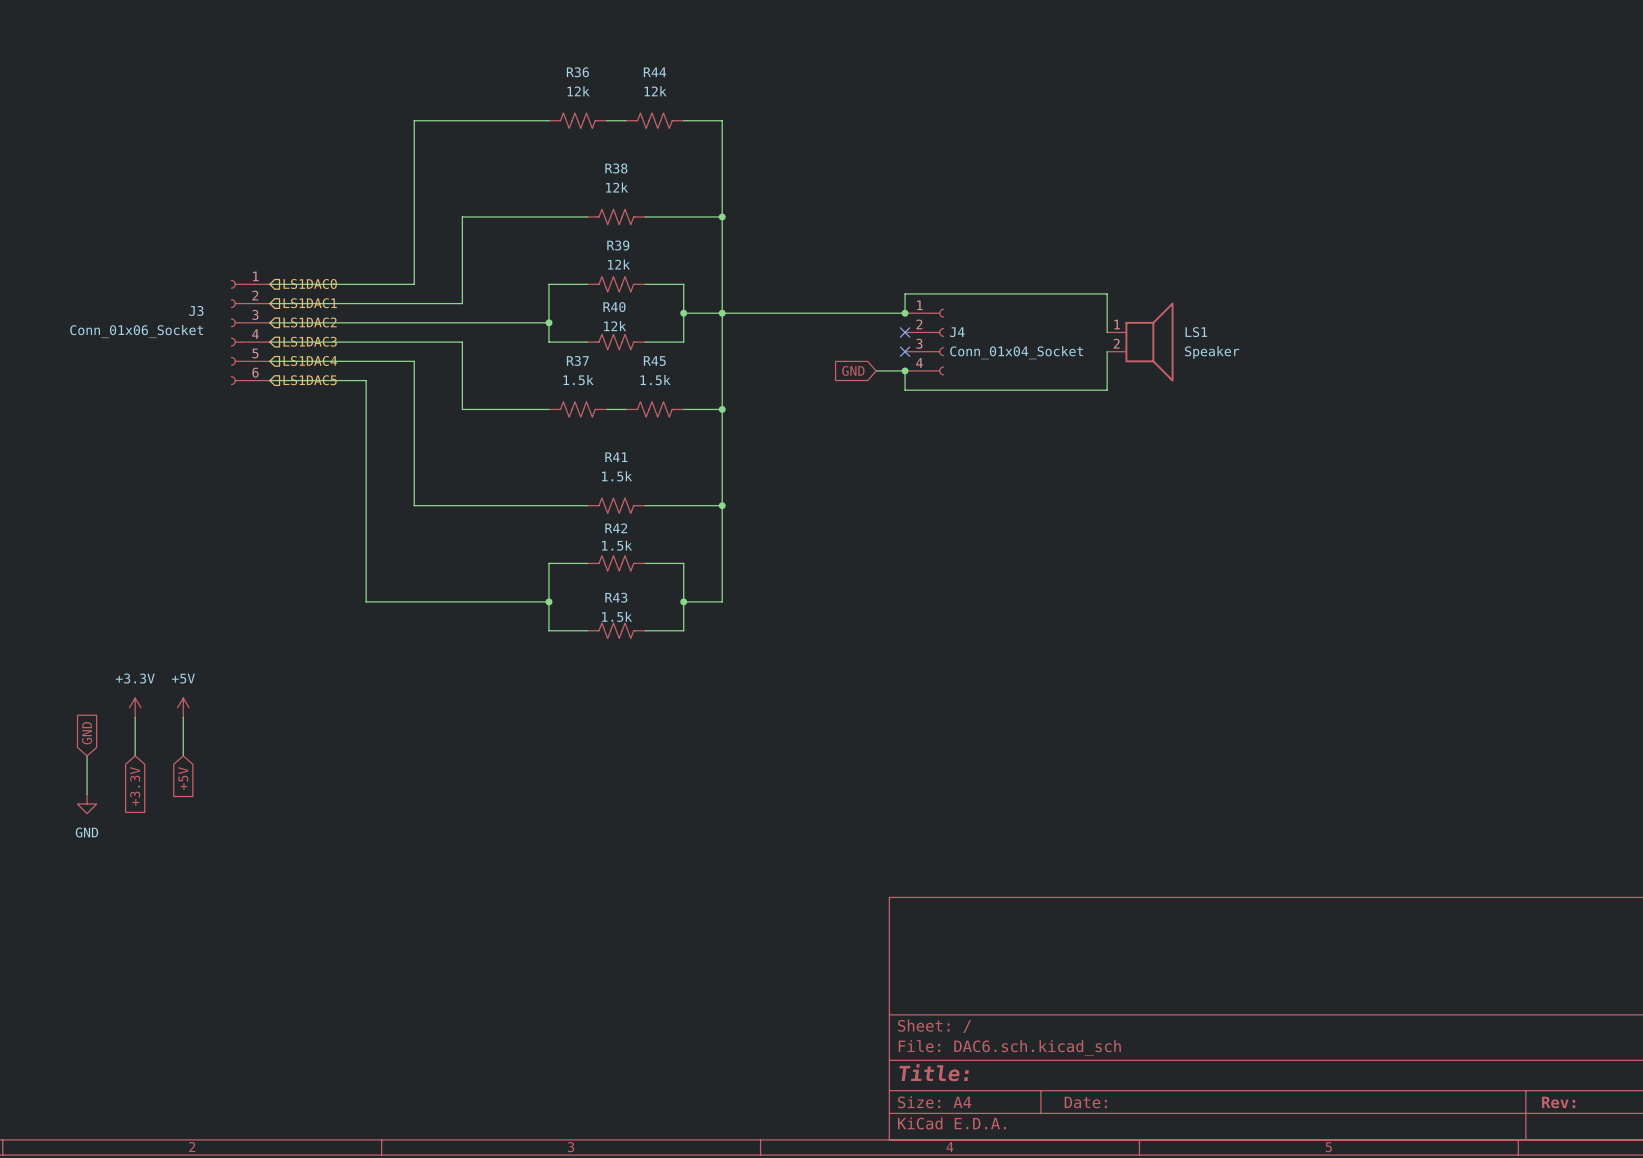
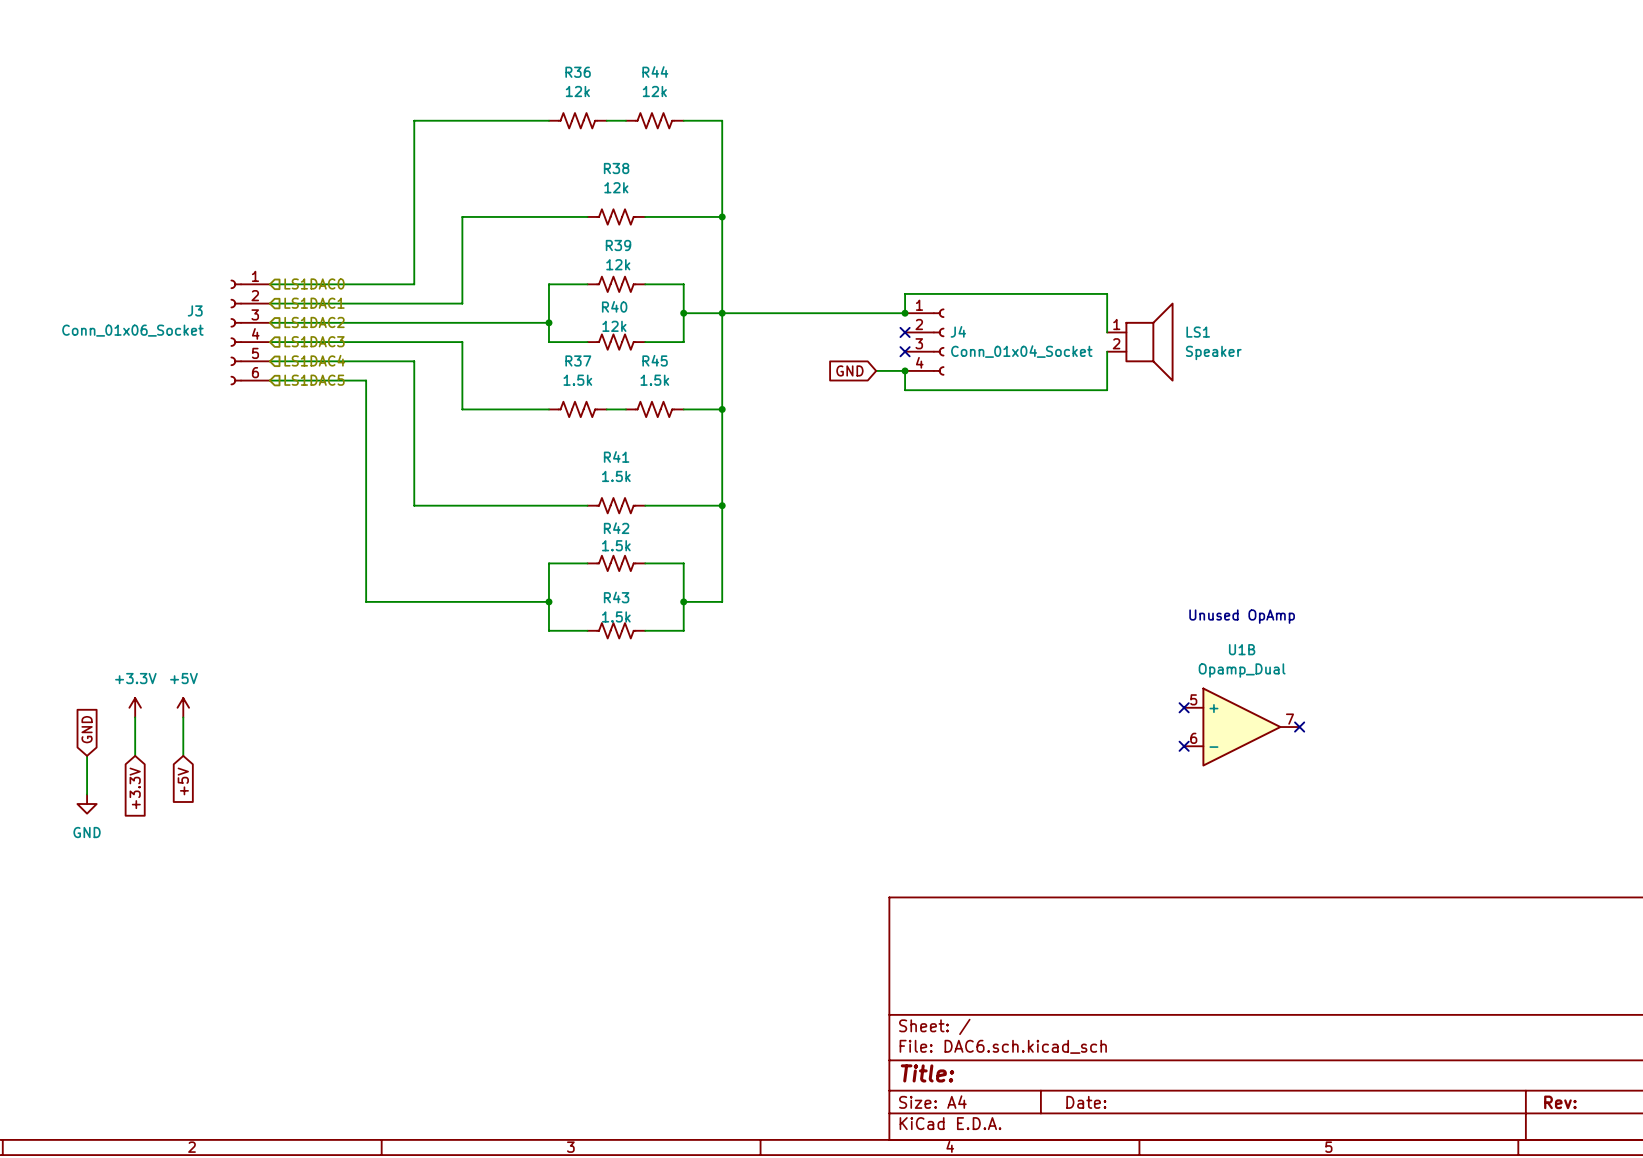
text: none -> Unused OpAmp (1242, 616)
no-connect mark: none -> (1184, 707)
U1B: none -> Opamp_Dual (1241, 727)
no-connect mark: none -> (1299, 727)
no-connect mark: none -> (1184, 746)

